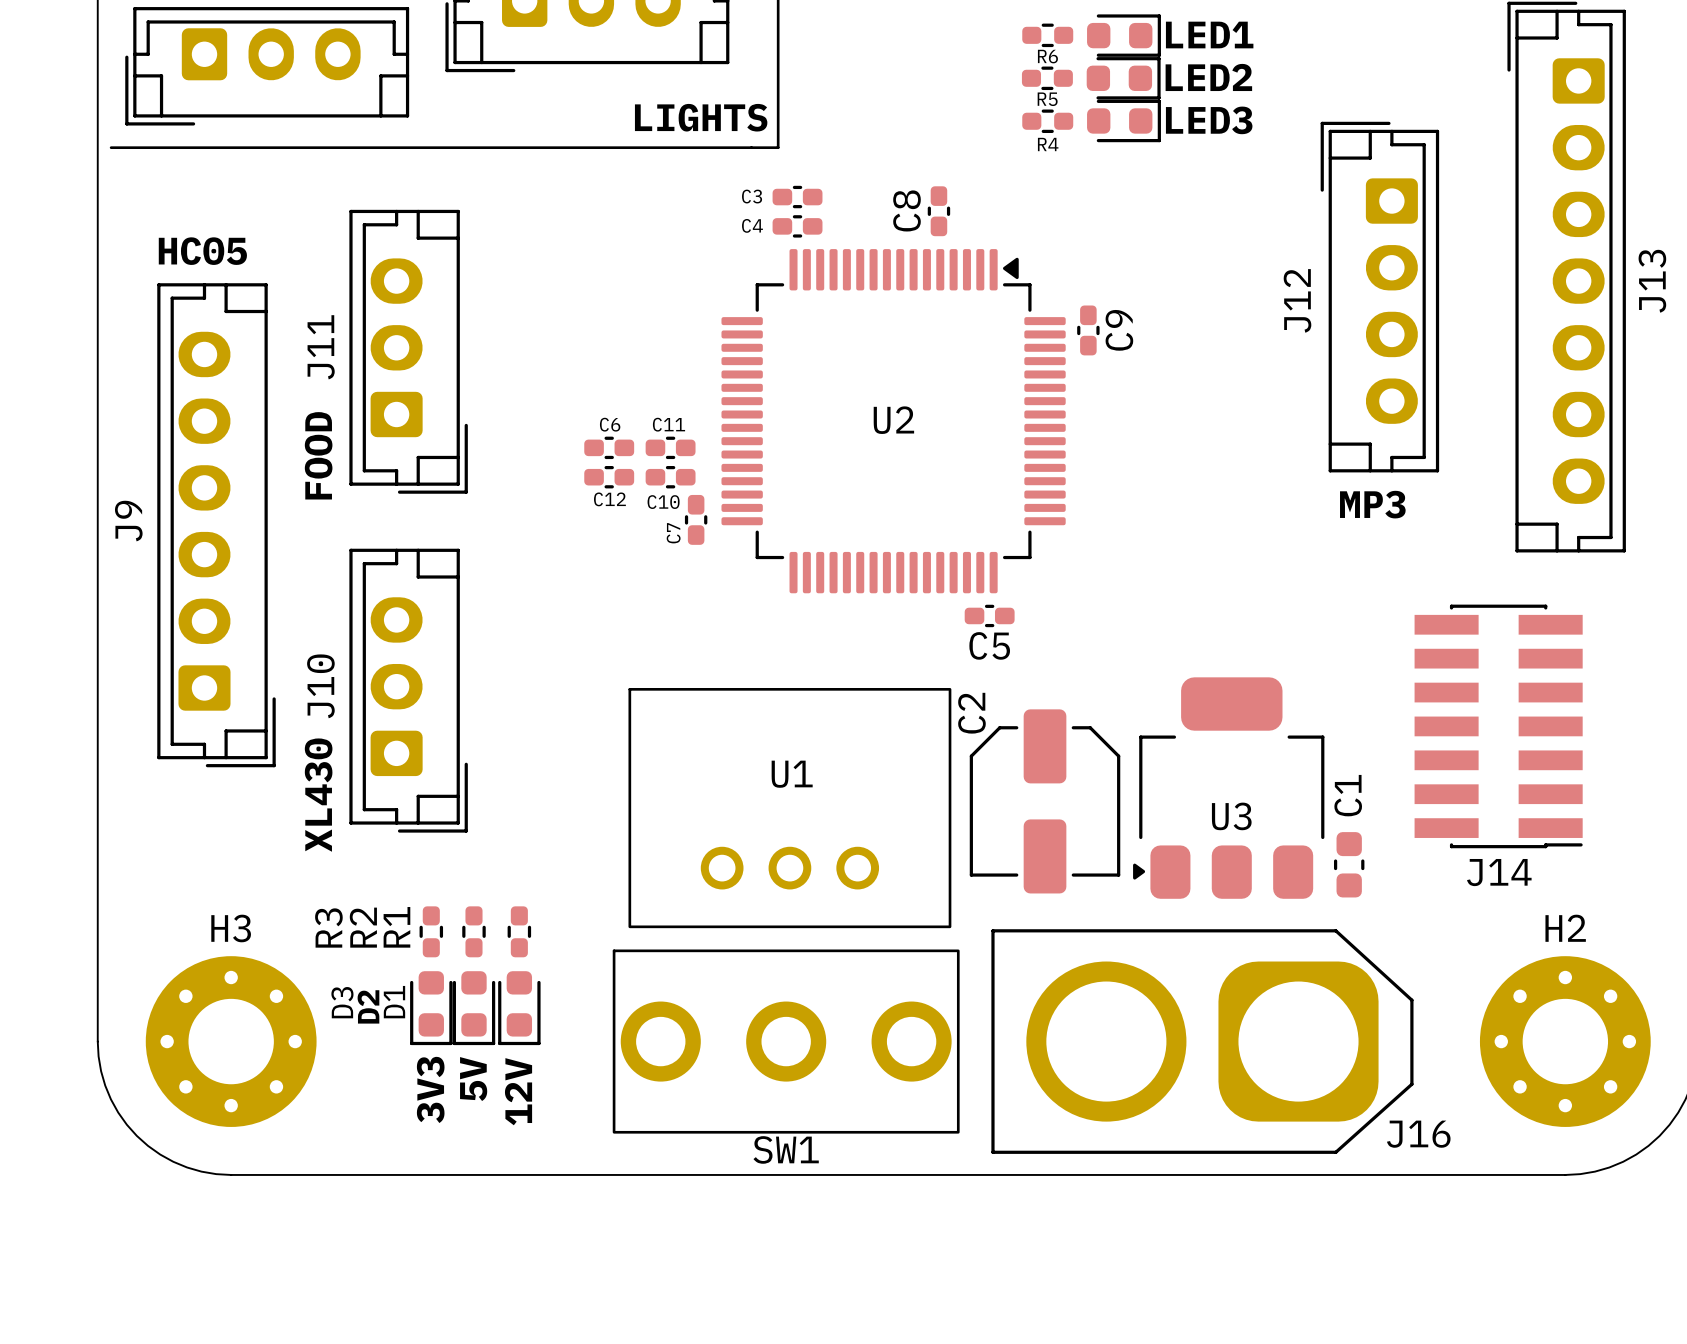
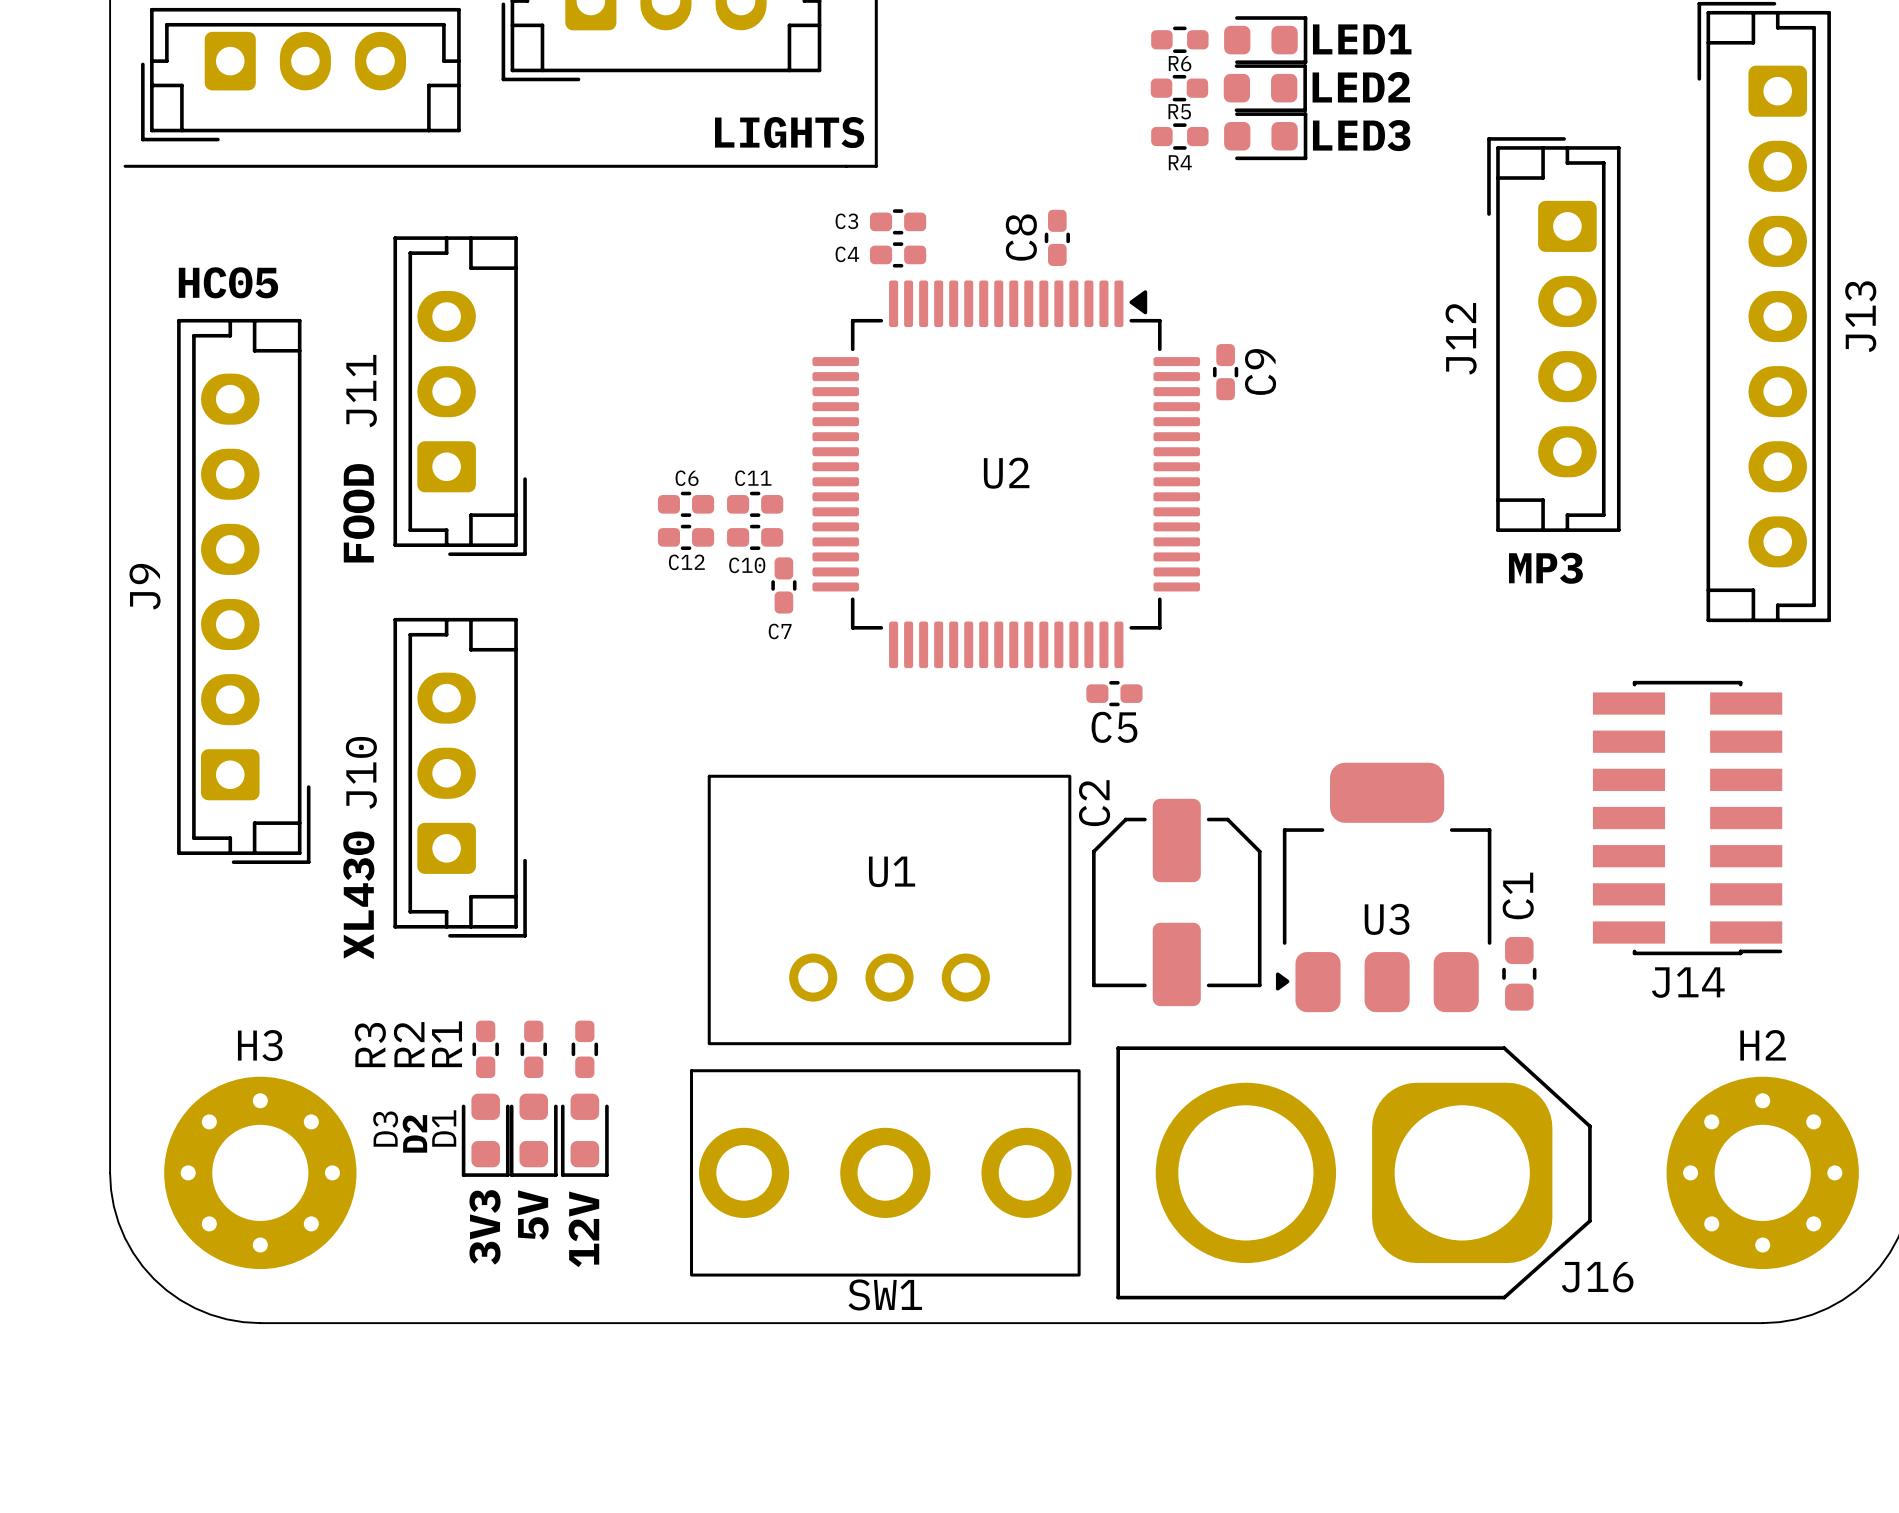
C7 name rotation: 0° (673, 533) -> 90° clockwise (780, 631)
C7 name position: C7 (673, 533) -> C7 (780, 631)

